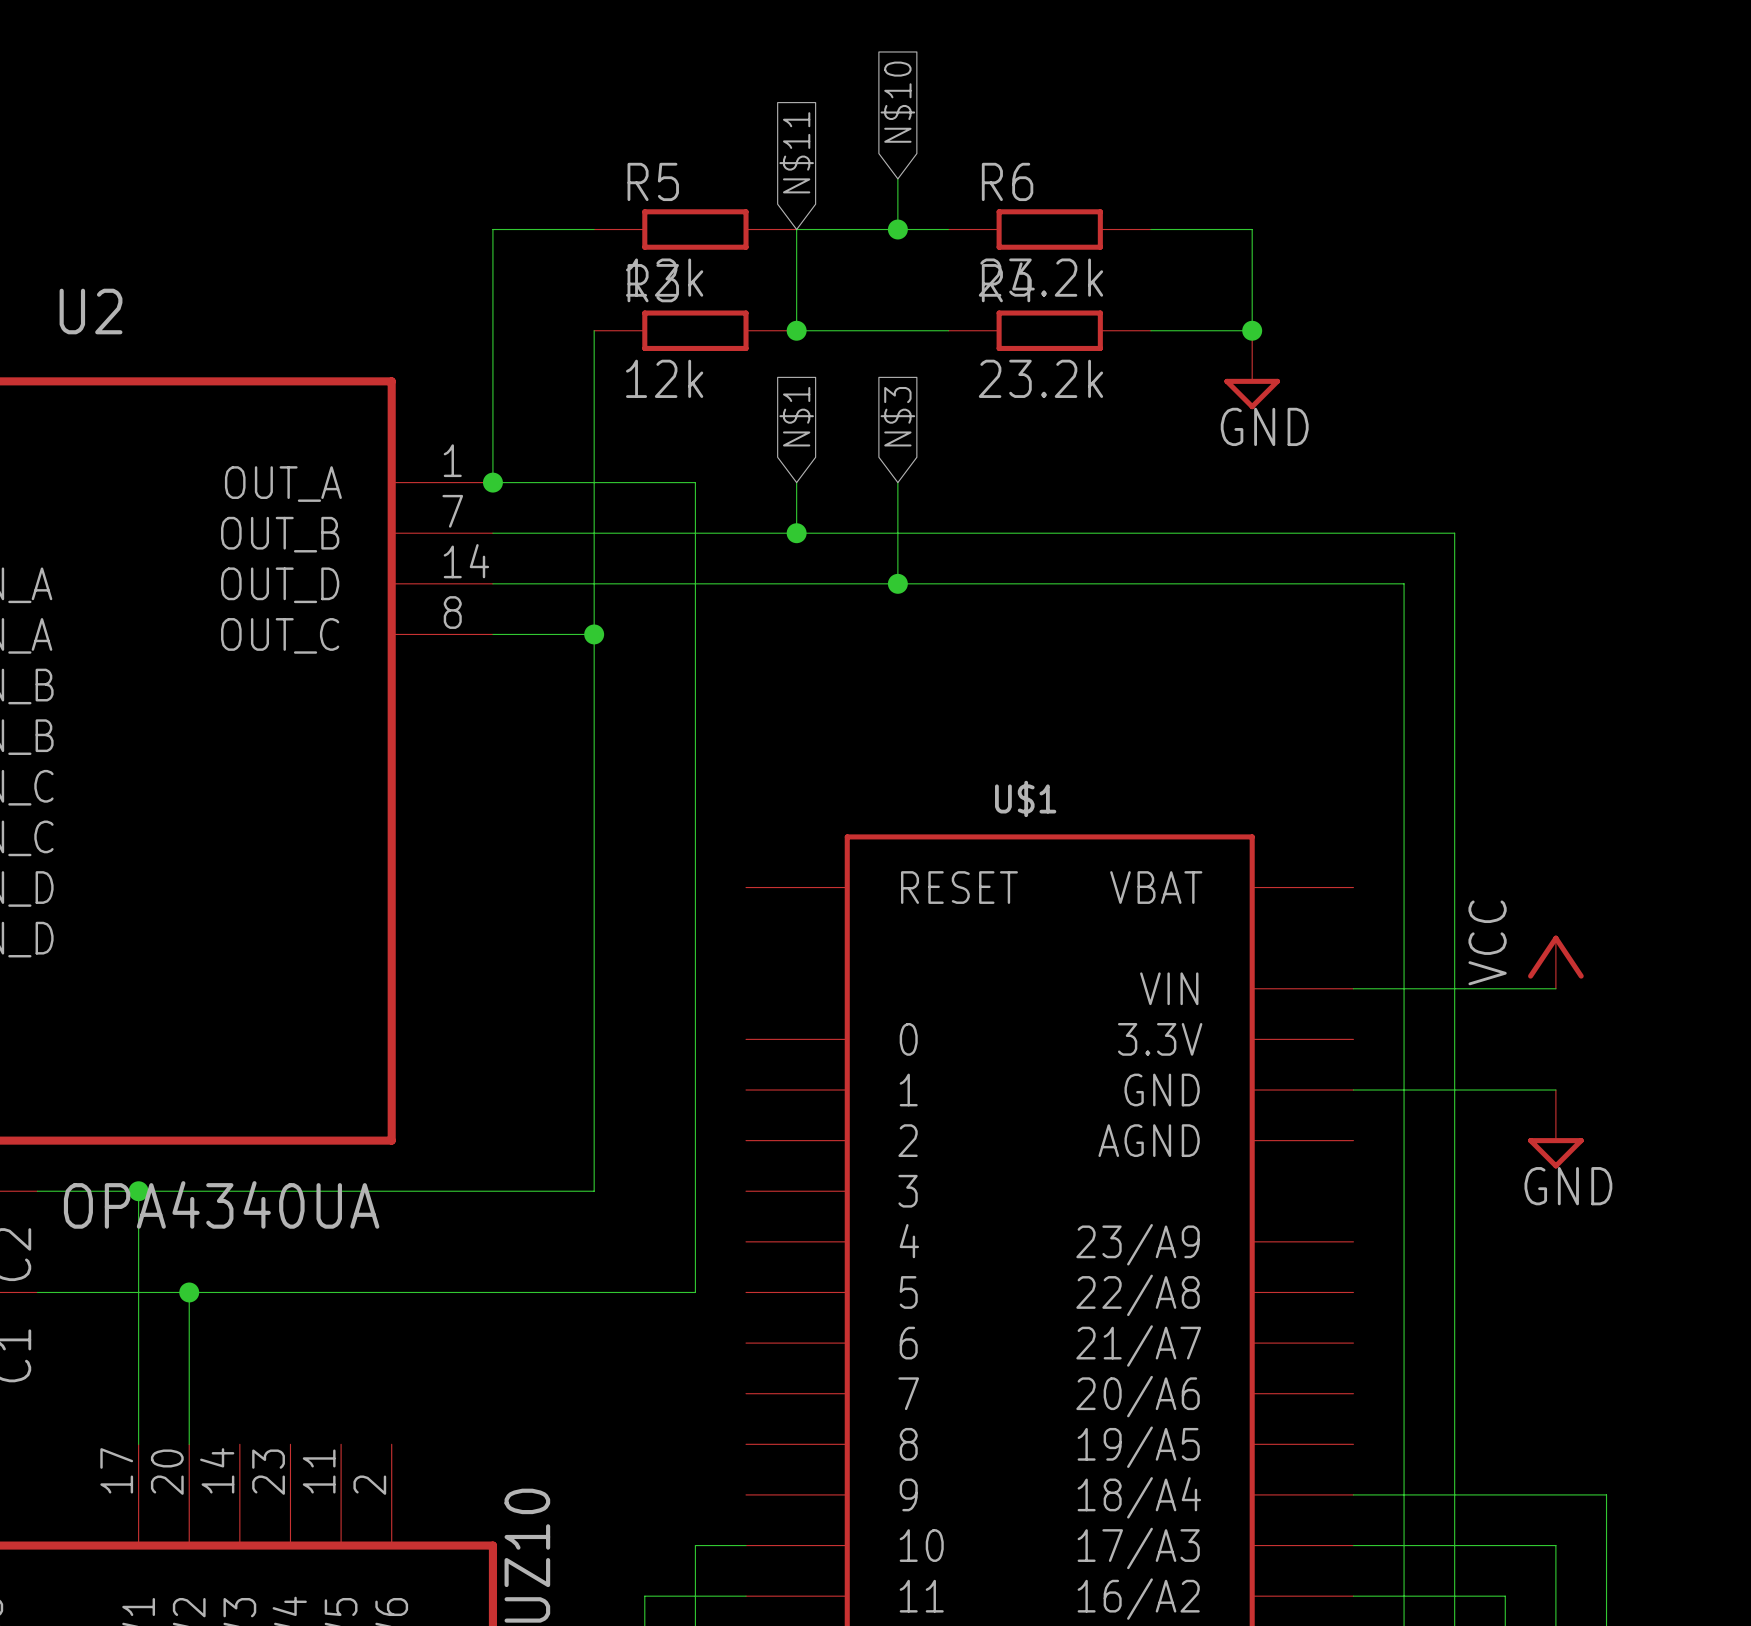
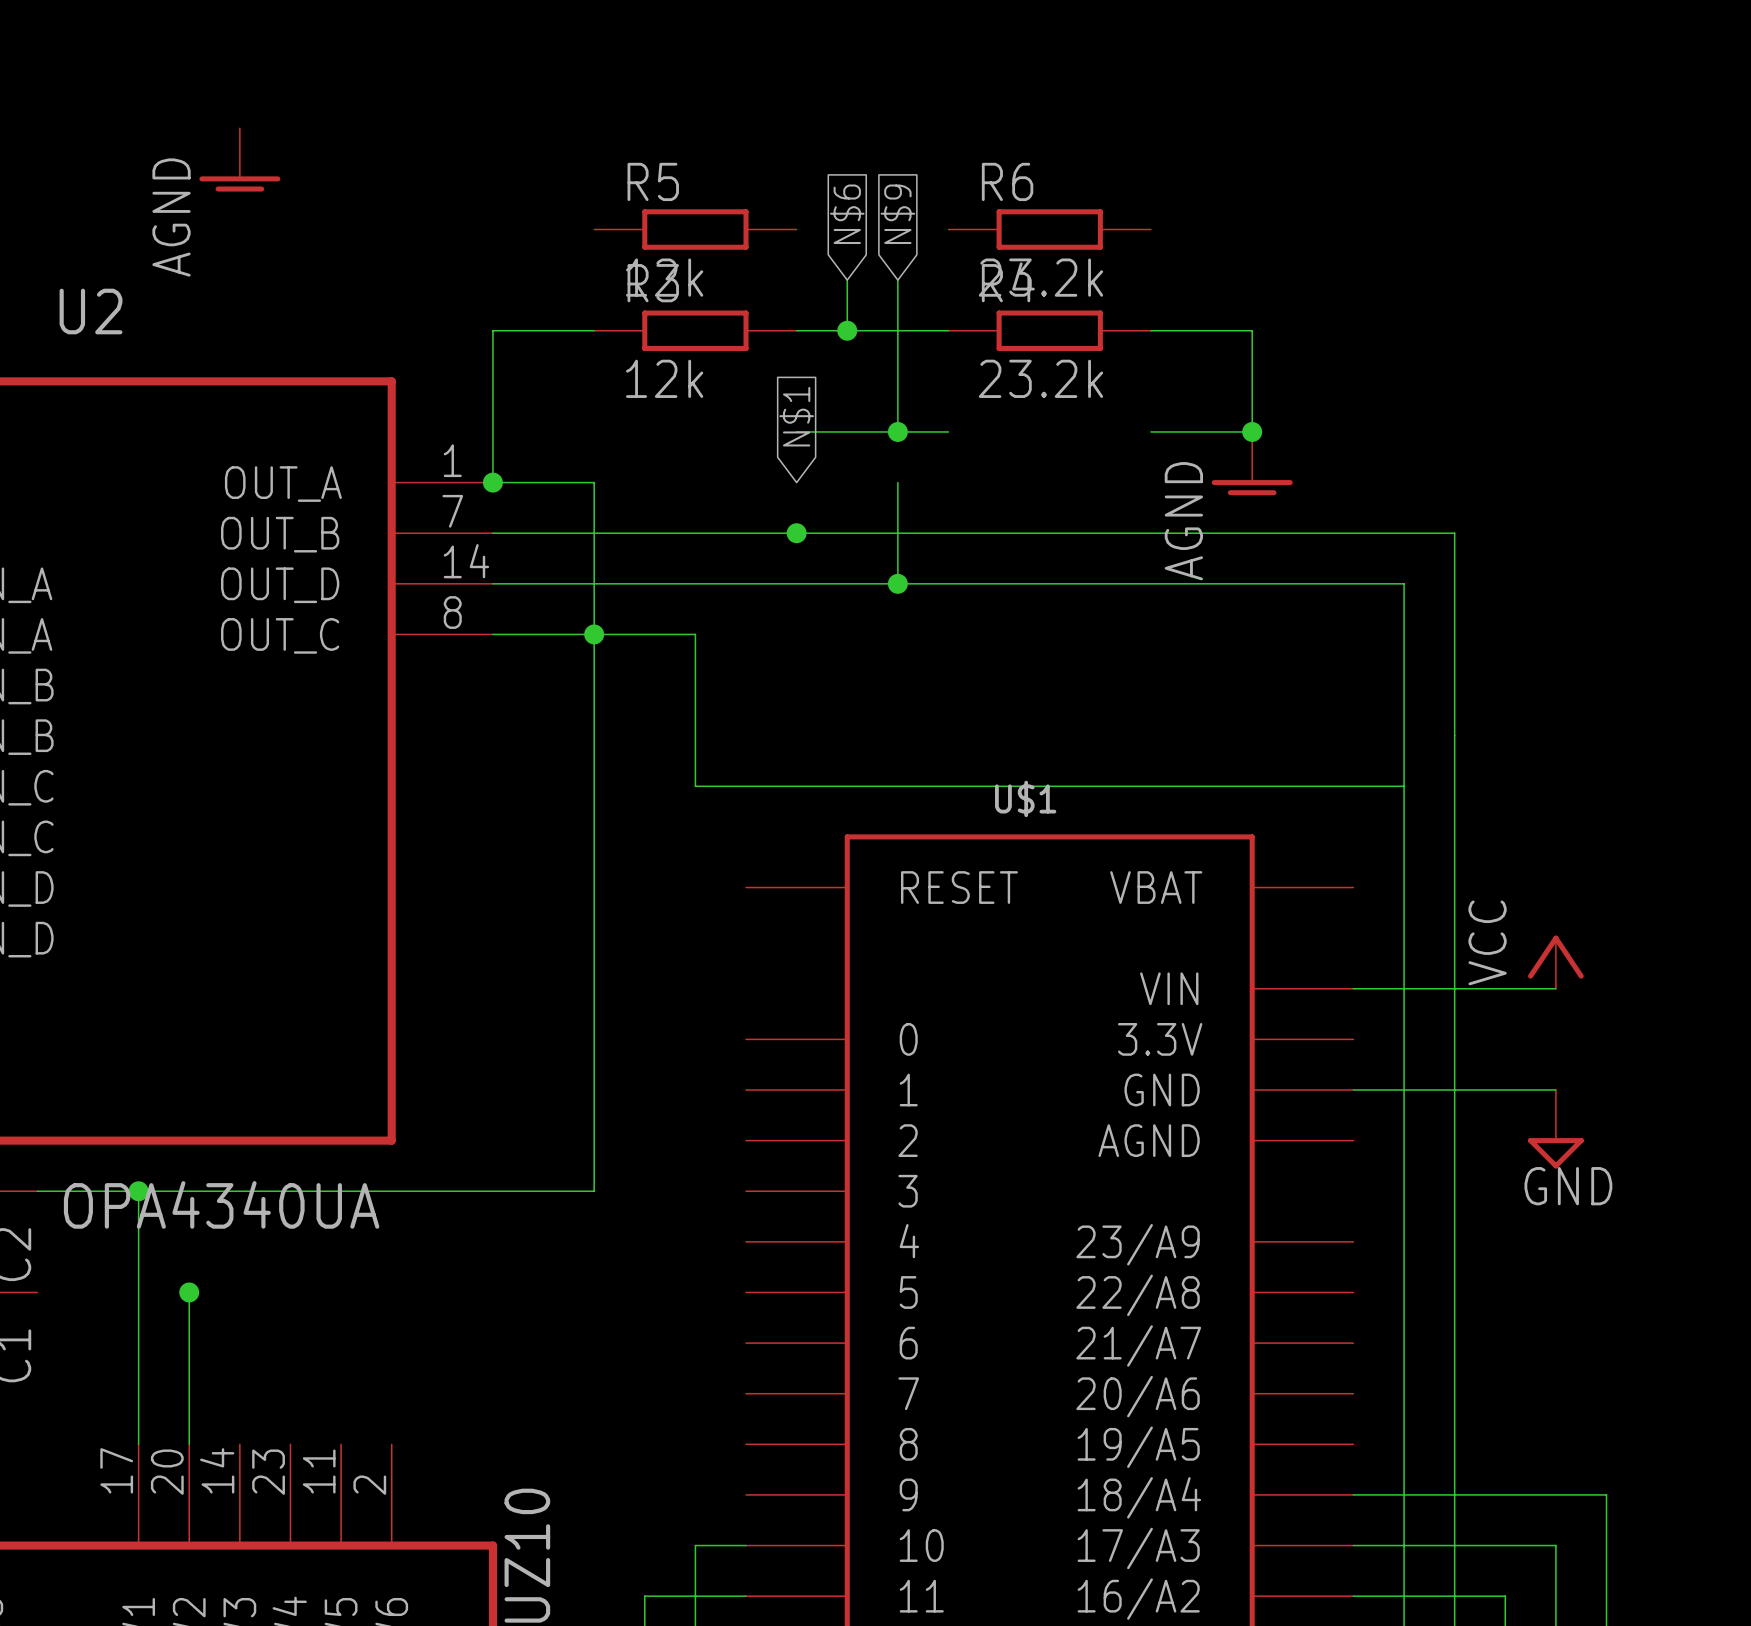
global label: N$10 (897, 102) -> none
global label: N$11 (796, 152) -> none
power symbol: none -> AGND (239, 159)
wire: (897, 178) (897, 229) -> (847, 280) (847, 330)
global label: none -> N$6 (847, 214)
global label: none -> N$9 (897, 214)
wire: (594, 229) (492, 229) (492, 330) -> (594, 330) (492, 330)
junction: (897, 229) -> none
wire: (948, 229) (796, 229) (796, 330) -> none
wire: (1150, 229) (1252, 229) (1252, 330) -> (1150, 431) (1252, 431) (1252, 330)
wire: none -> (897, 280) (897, 431)
wire: (594, 330) (594, 482) (695, 482) (695, 634) -> (594, 634) (695, 634)
junction position: (796, 330) -> (847, 330)
junction position: (1252, 330) -> (1252, 431)
power symbol: GND (1252, 369) -> none
global label: N$3 (897, 416) -> none
wire: none -> (796, 431) (948, 431)
junction: none -> (897, 431)
power symbol: none -> AGND (1252, 463)
wire: (796, 482) (796, 533) -> none
wire: (695, 786) (695, 1292) (37, 1292) -> (695, 786) (1404, 786)

